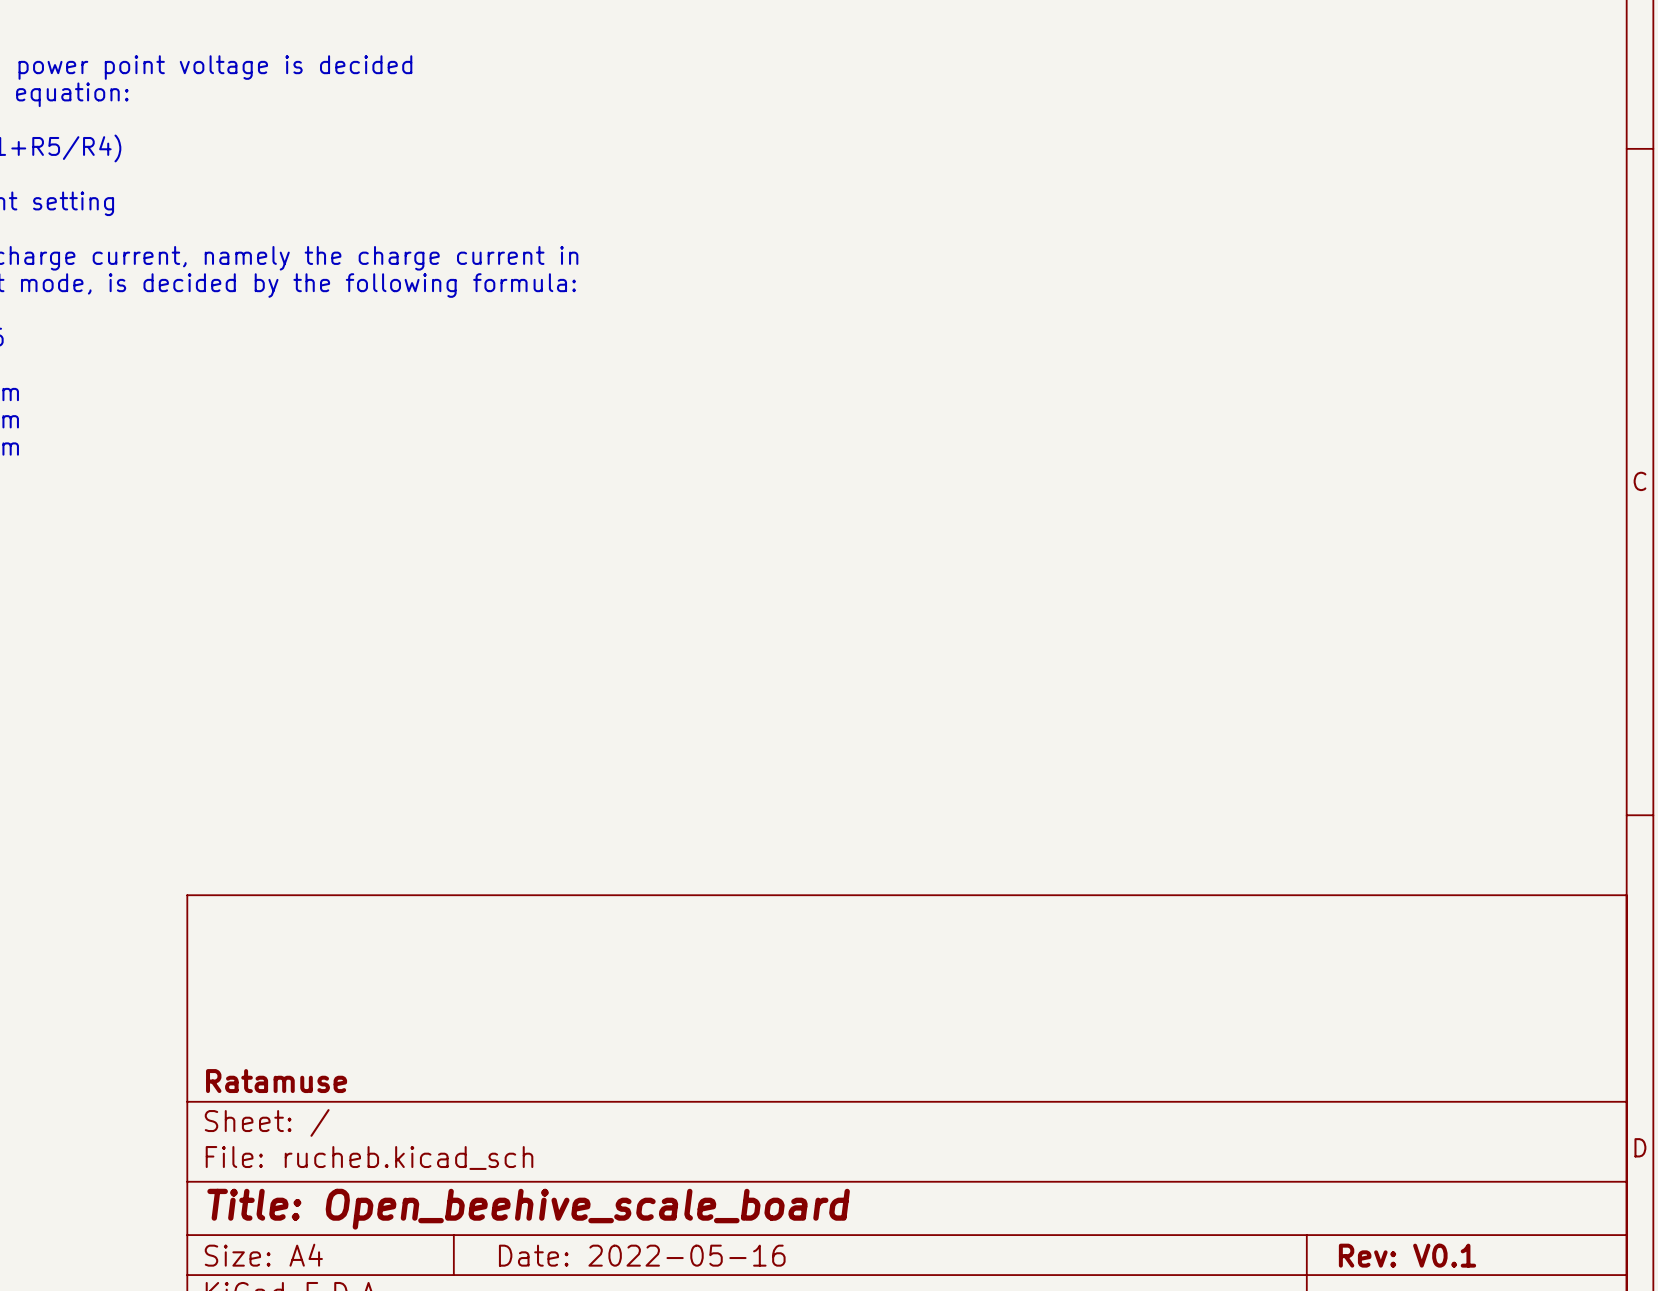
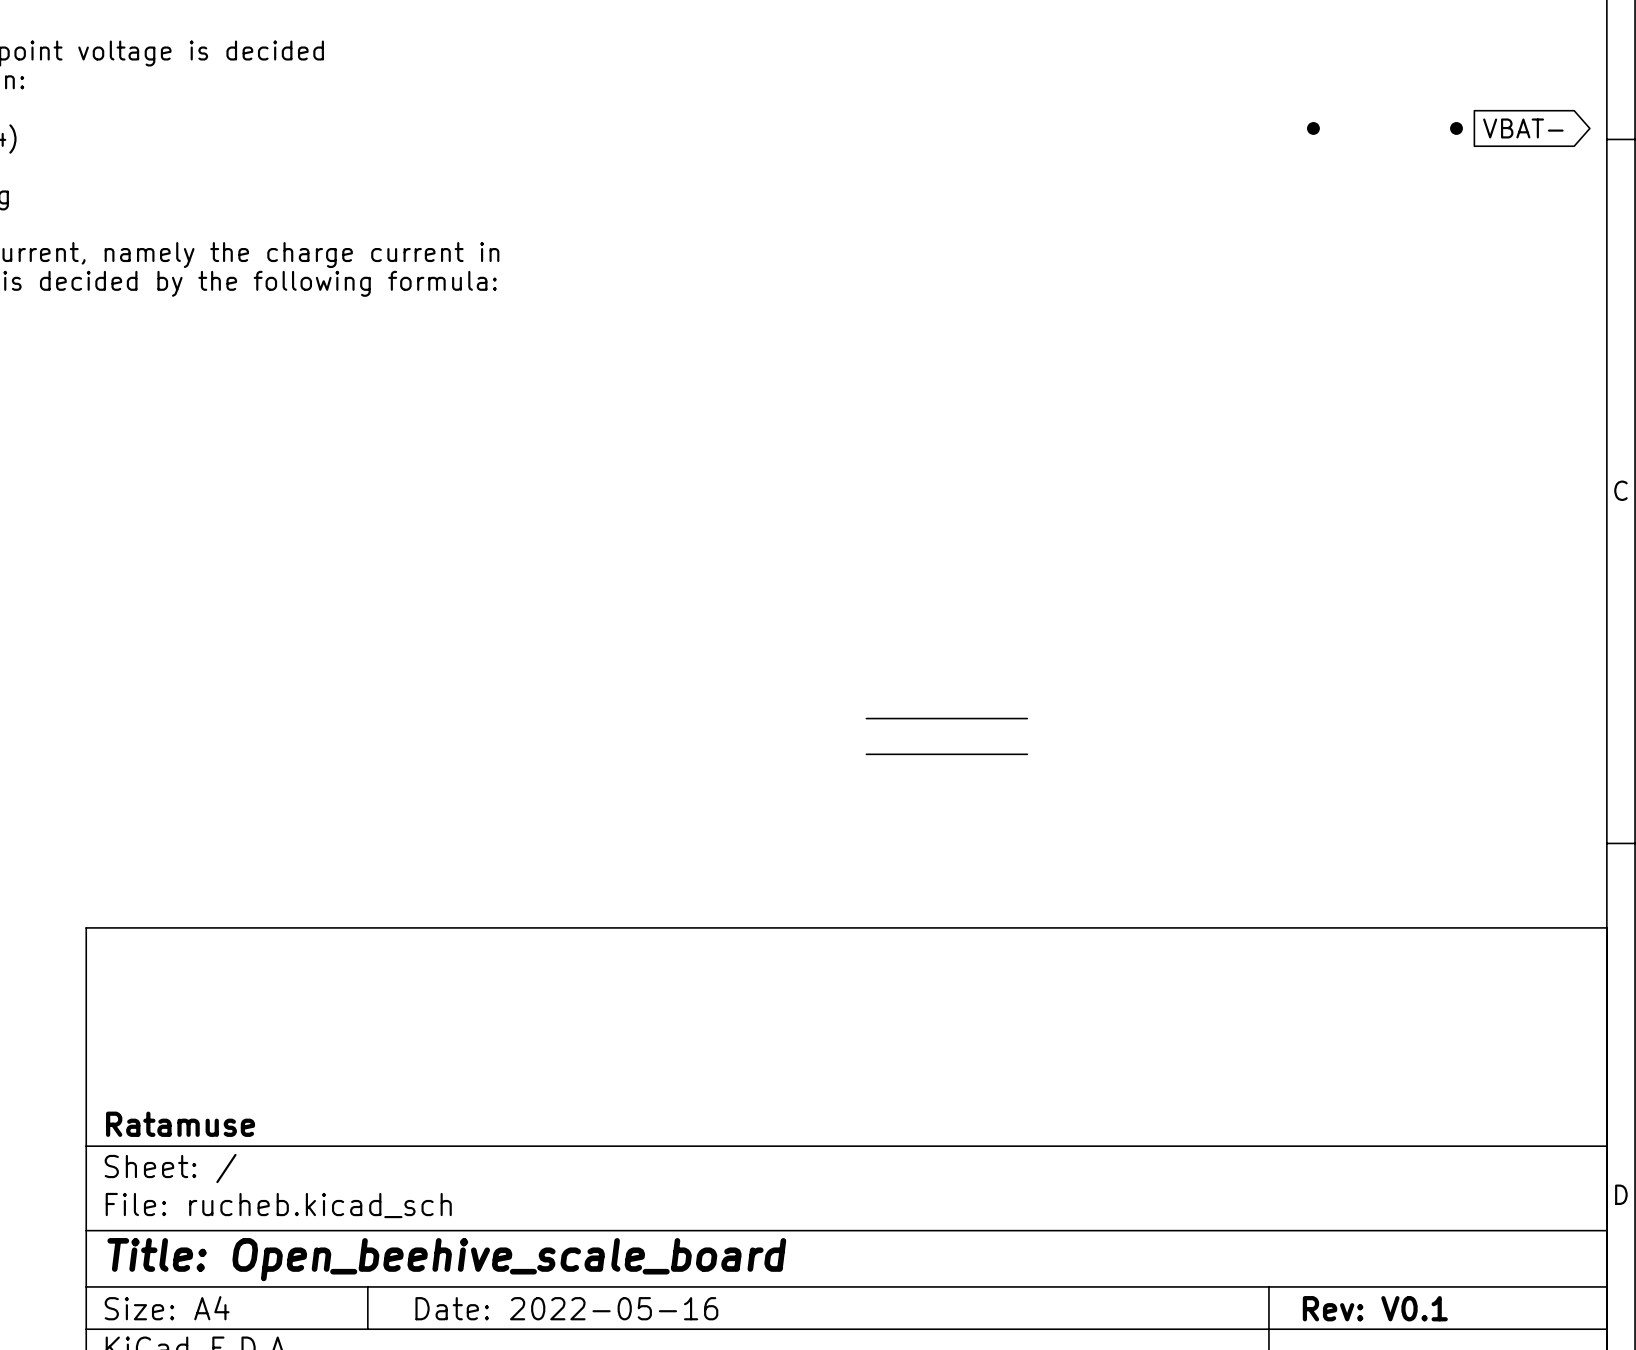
junction: none -> (1313, 128)
junction: none -> (1456, 128)
global label: none -> VBAT- (1523, 128)
wire: none -> (866, 718) (1027, 718)
wire: none -> (866, 754) (1027, 754)

